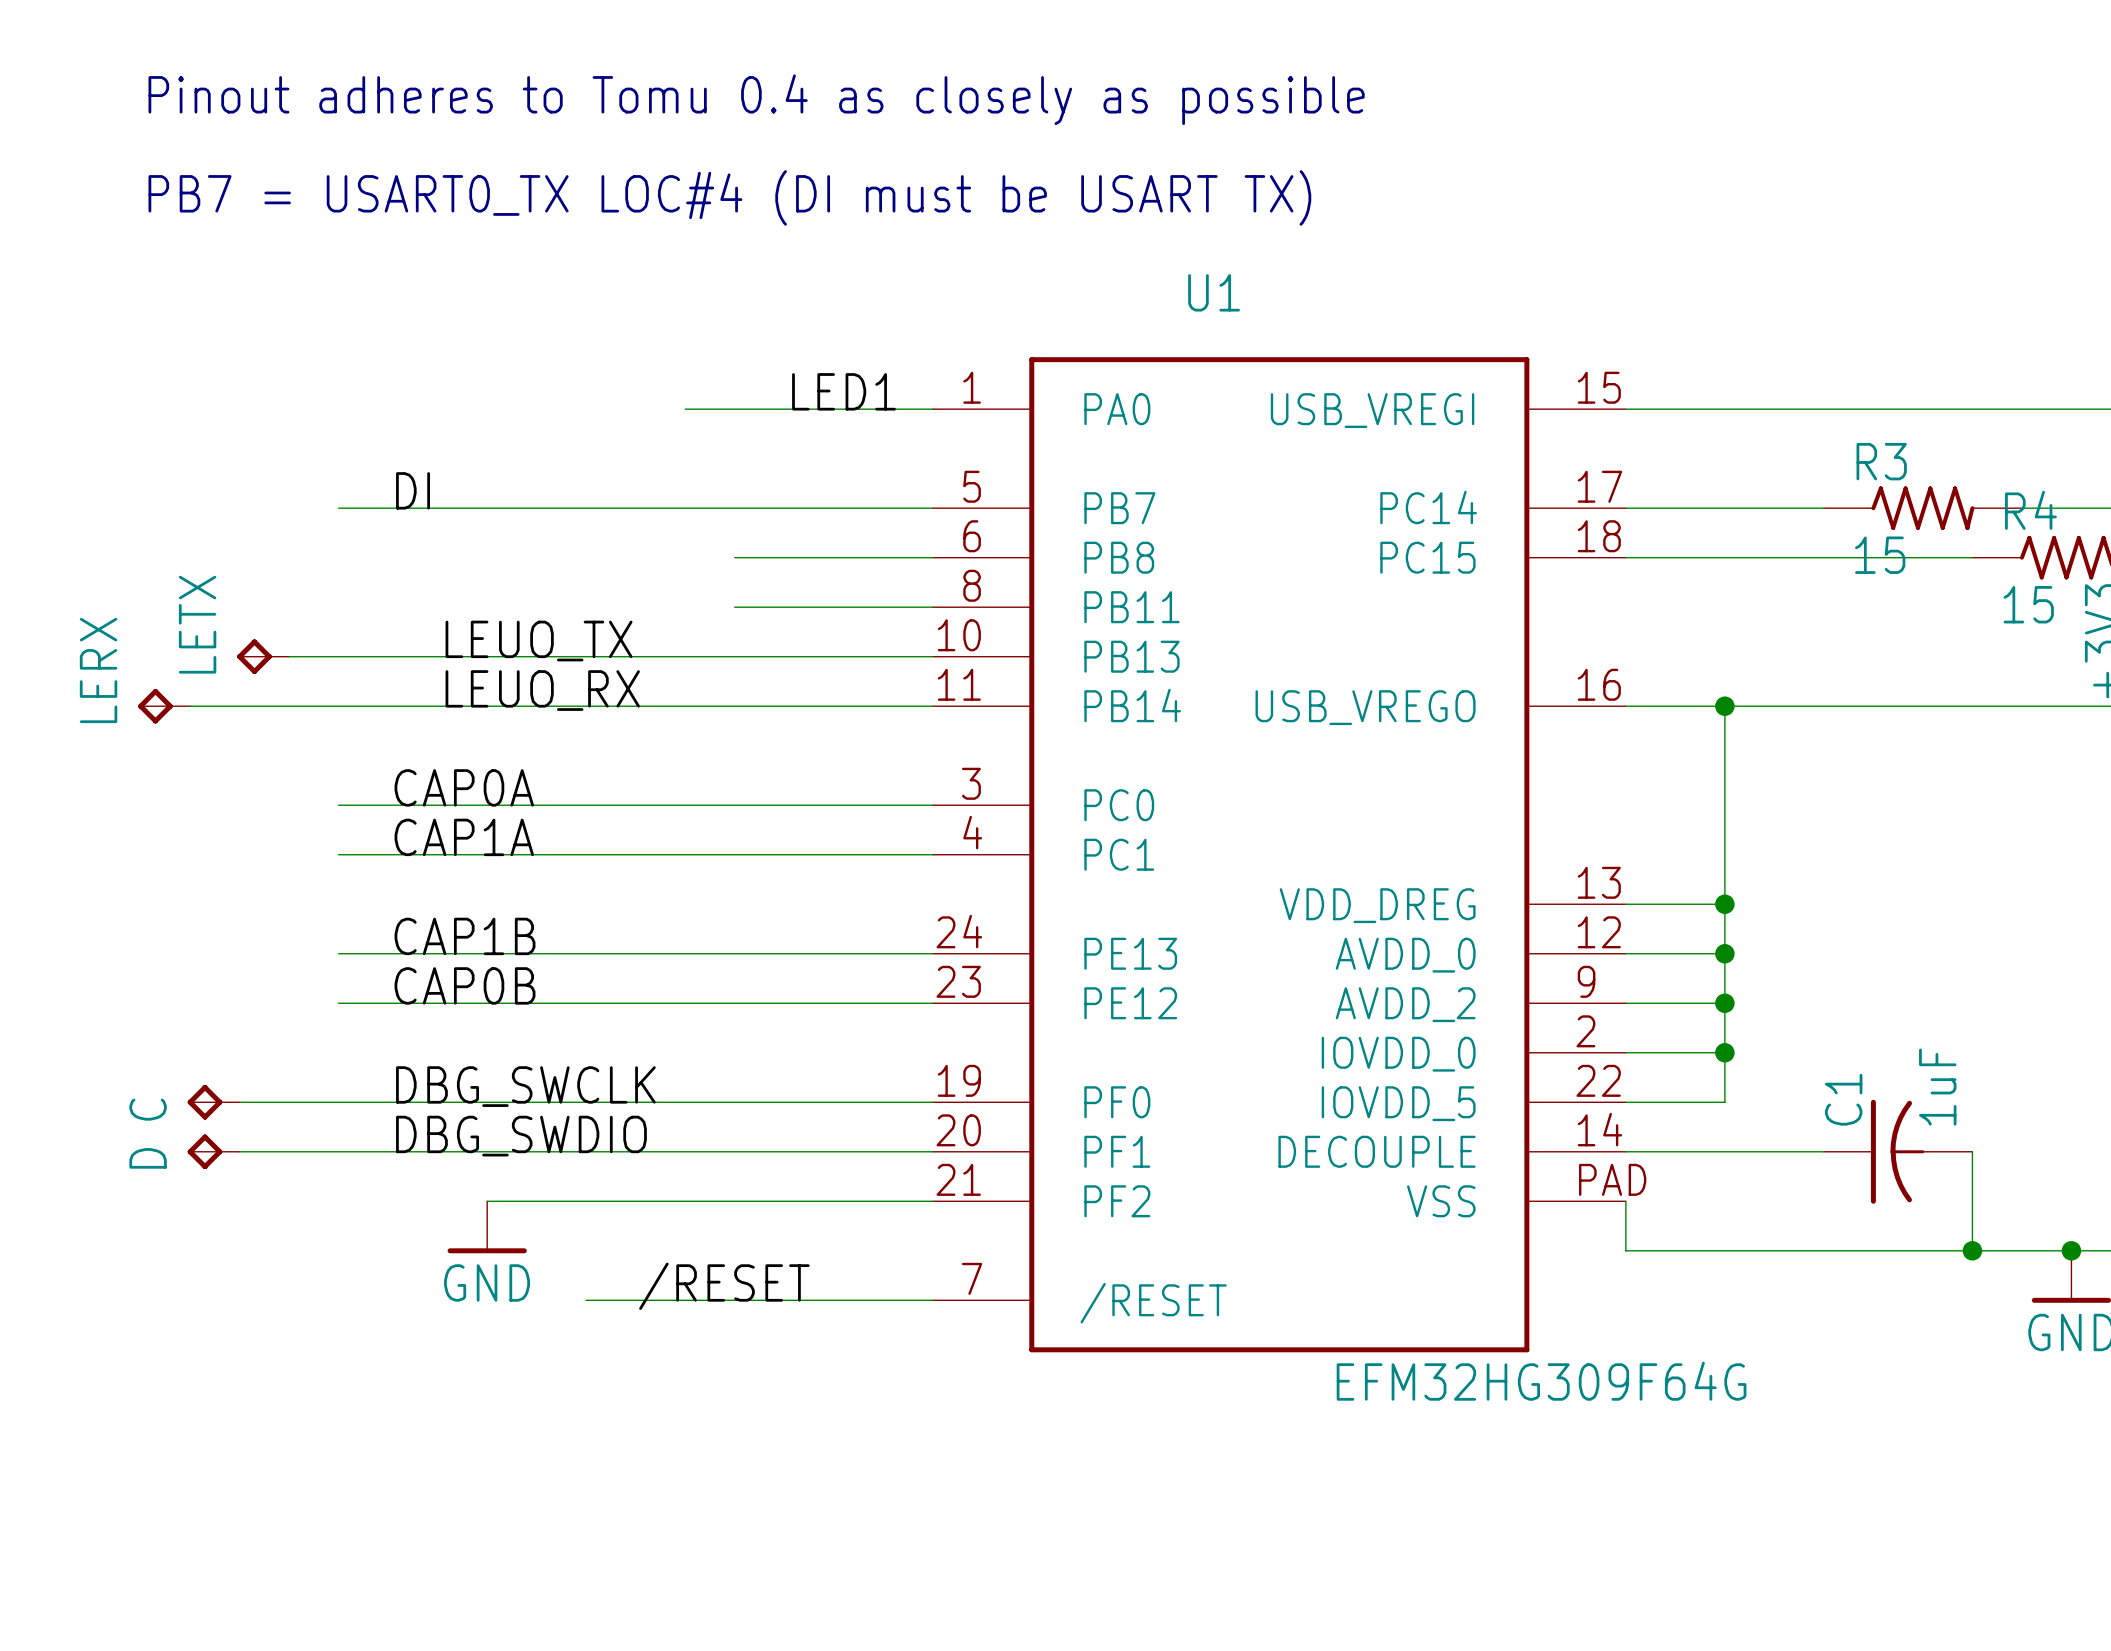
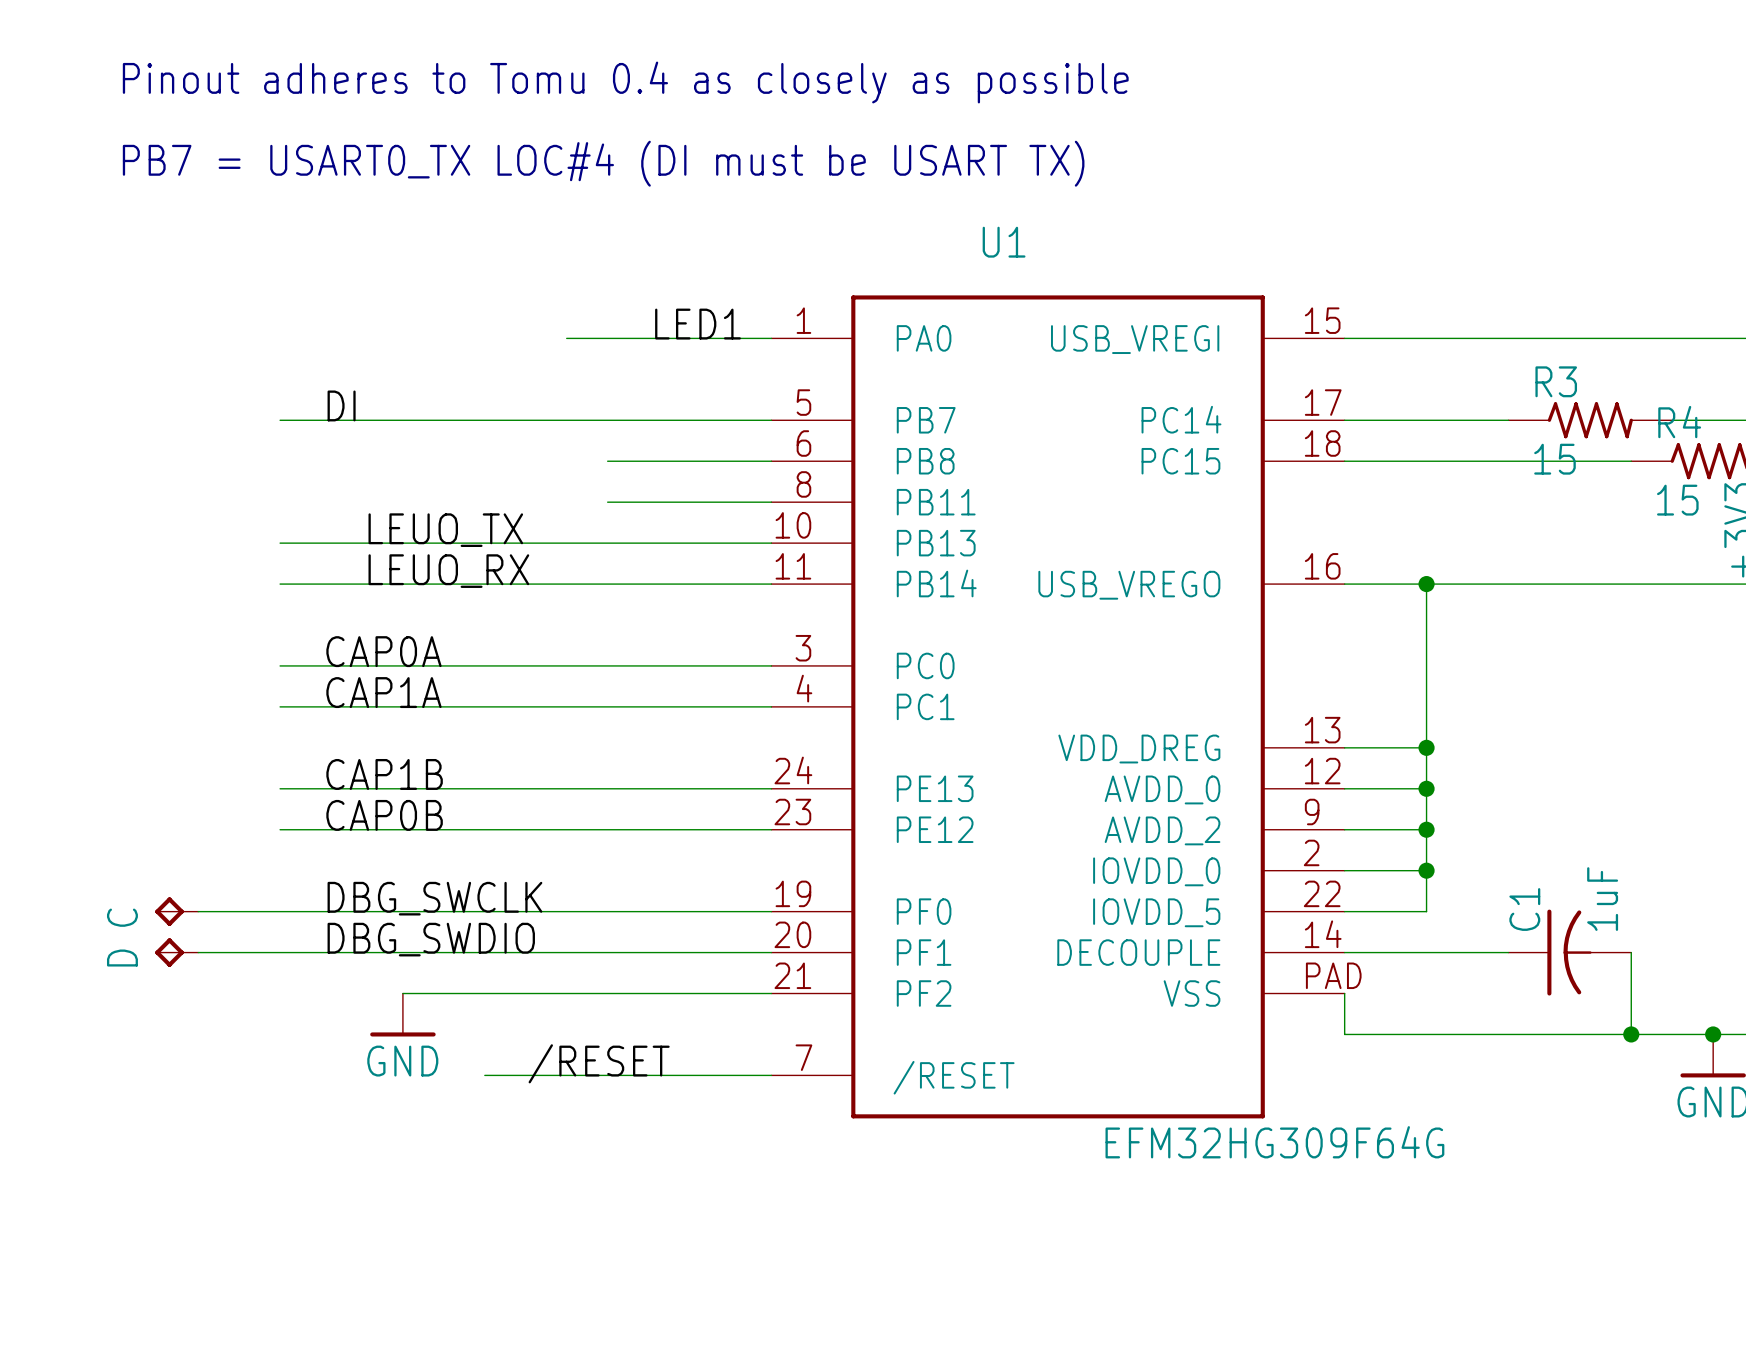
LETX: (263, 656) -> none
wire: (289, 656) (338, 656) -> none
LERX: (164, 706) -> none
wire: (190, 706) (338, 706) -> none

